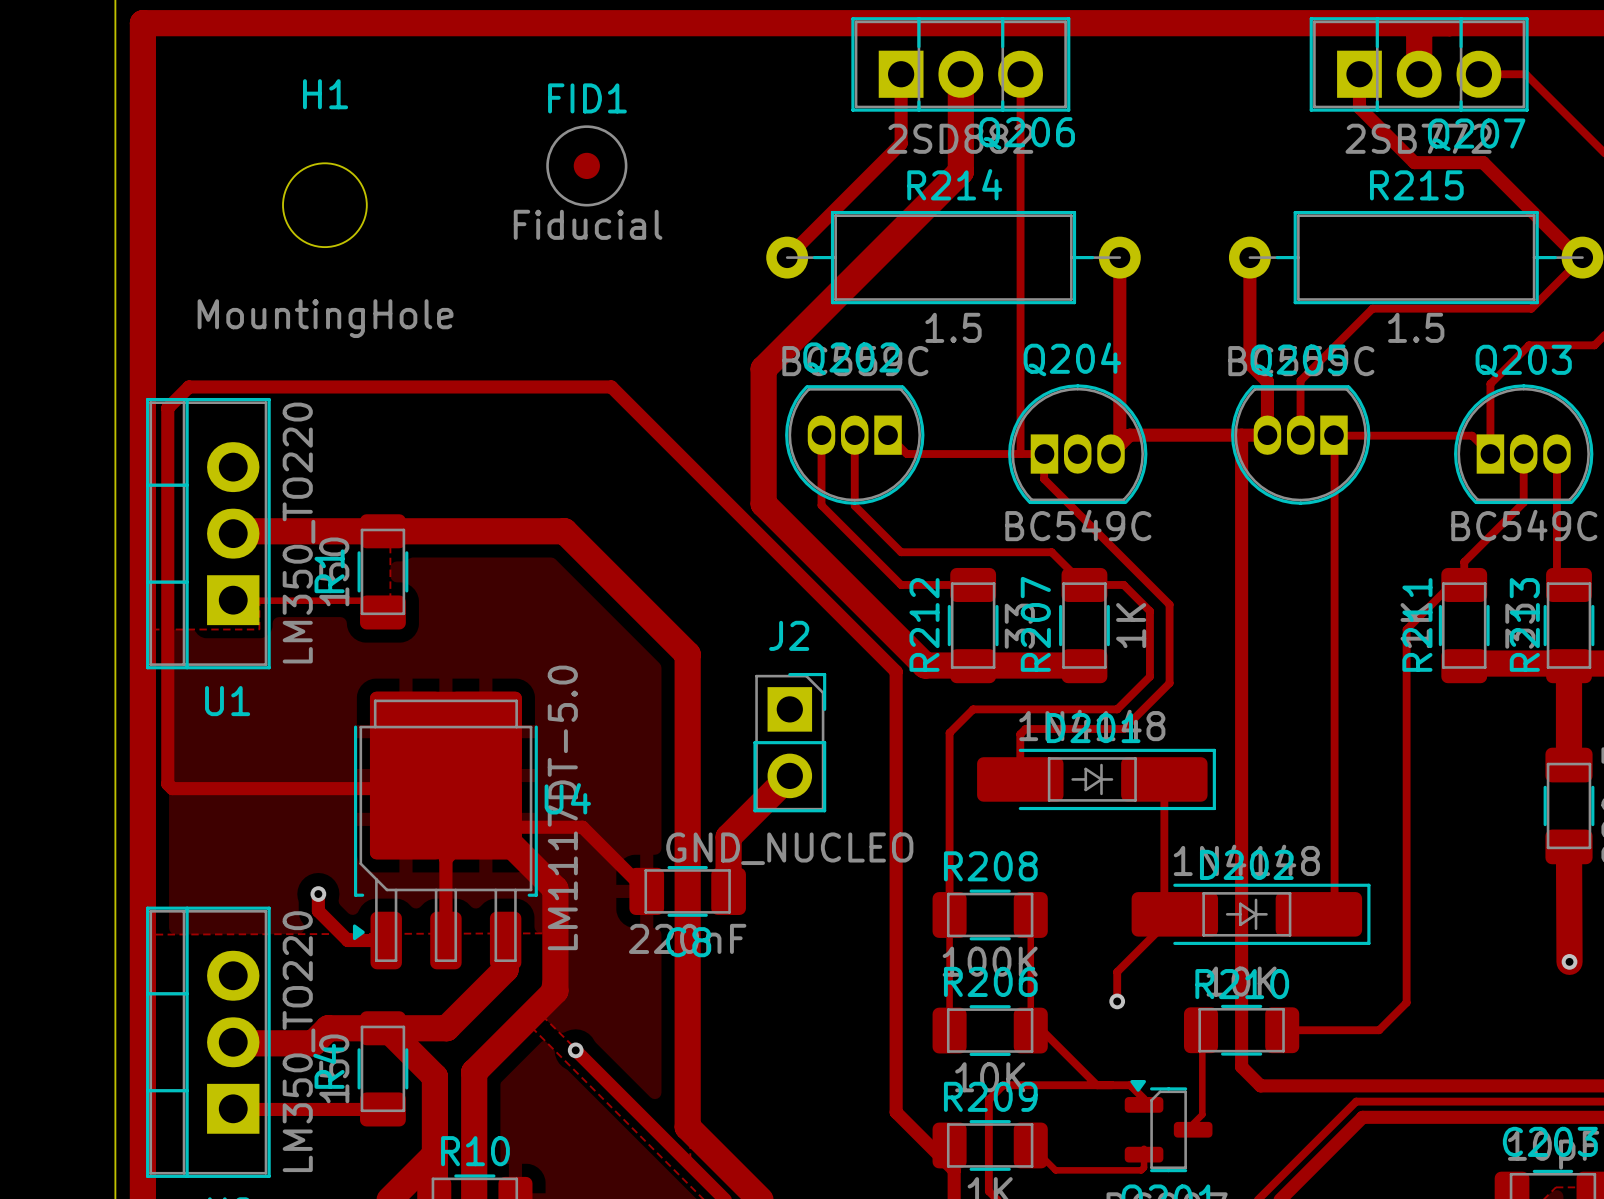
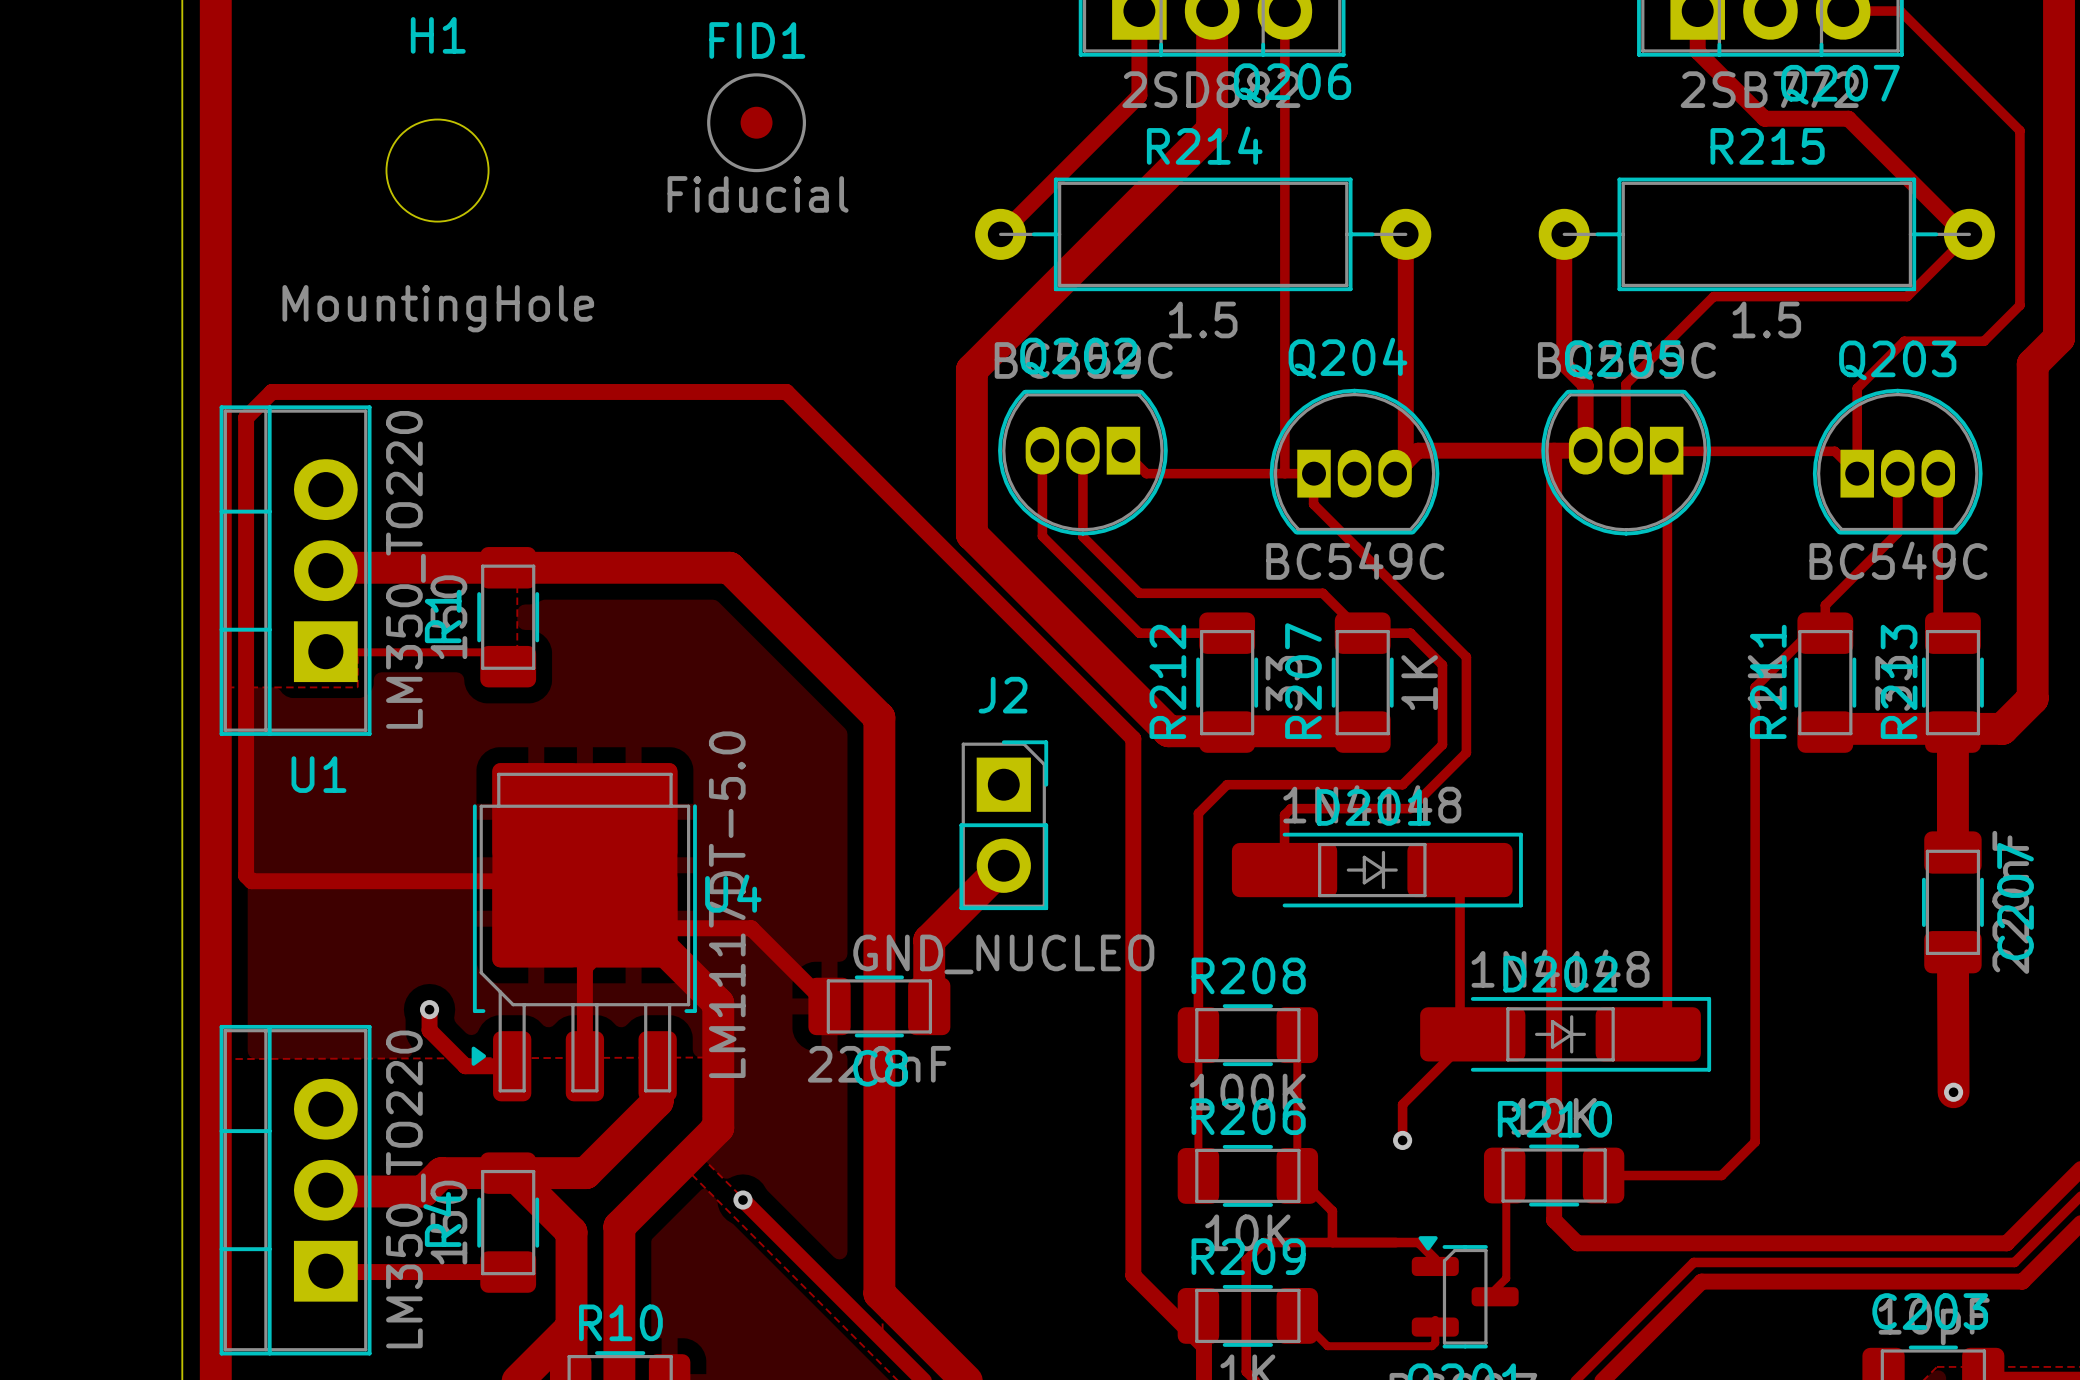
track: (1030, 1019) (1096, 1085) -> (1297, 1161) (1297, 1175) (1332, 1211) (1332, 1242)

